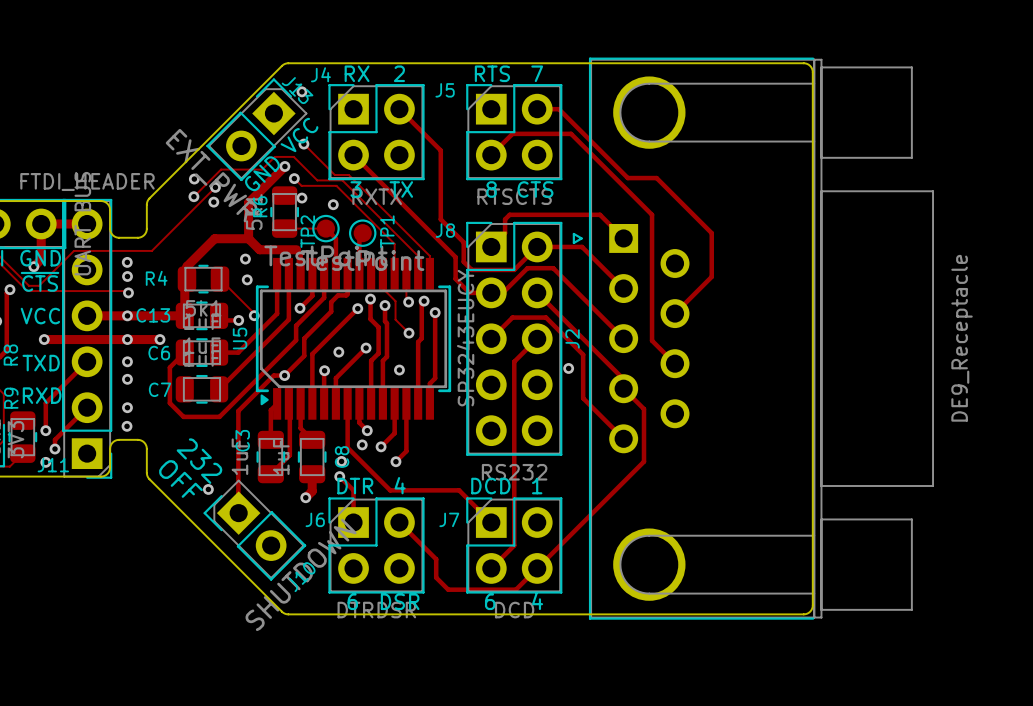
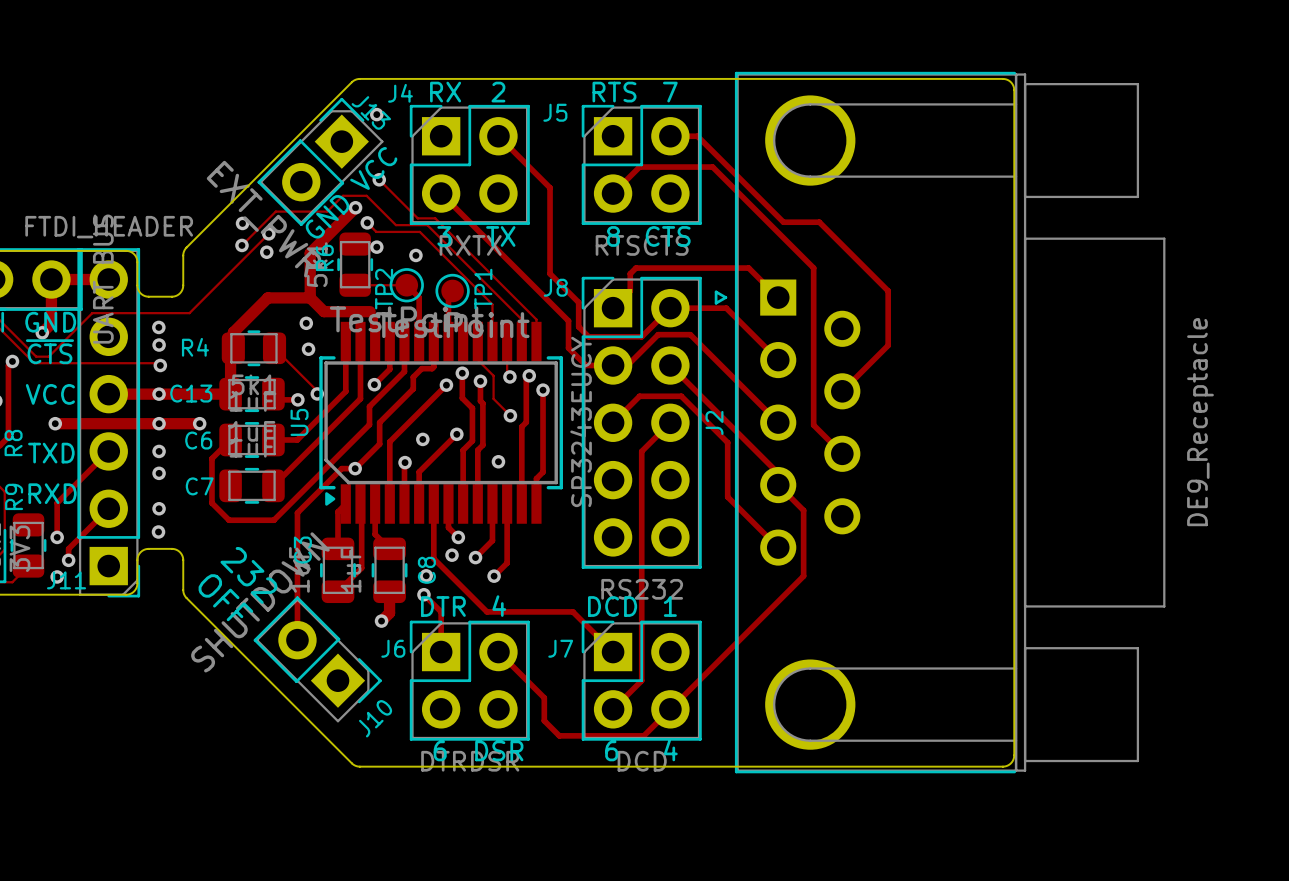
via: (568, 368) -> none
via: (208, 489) -> none
J10 rotation: 0° (254, 530) -> 180° (317, 659)

